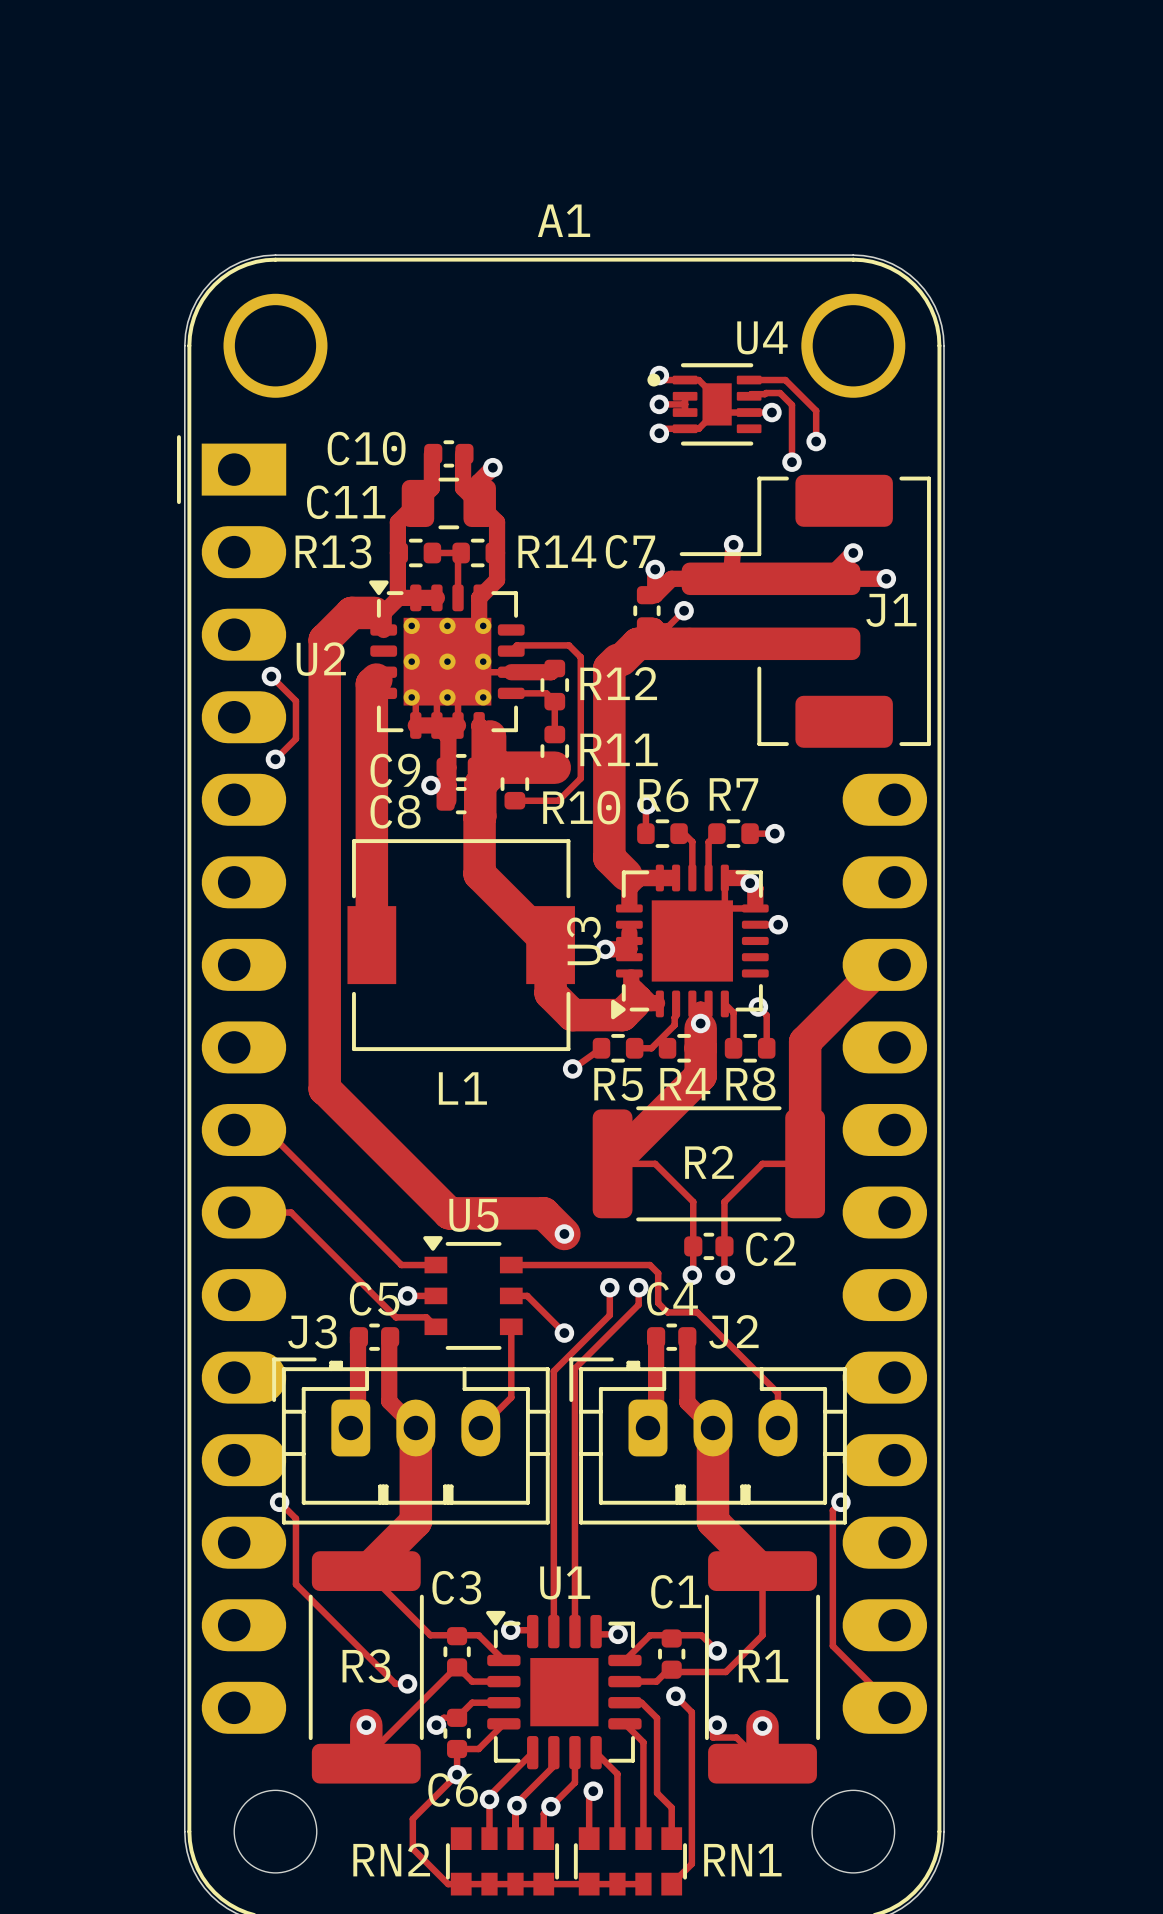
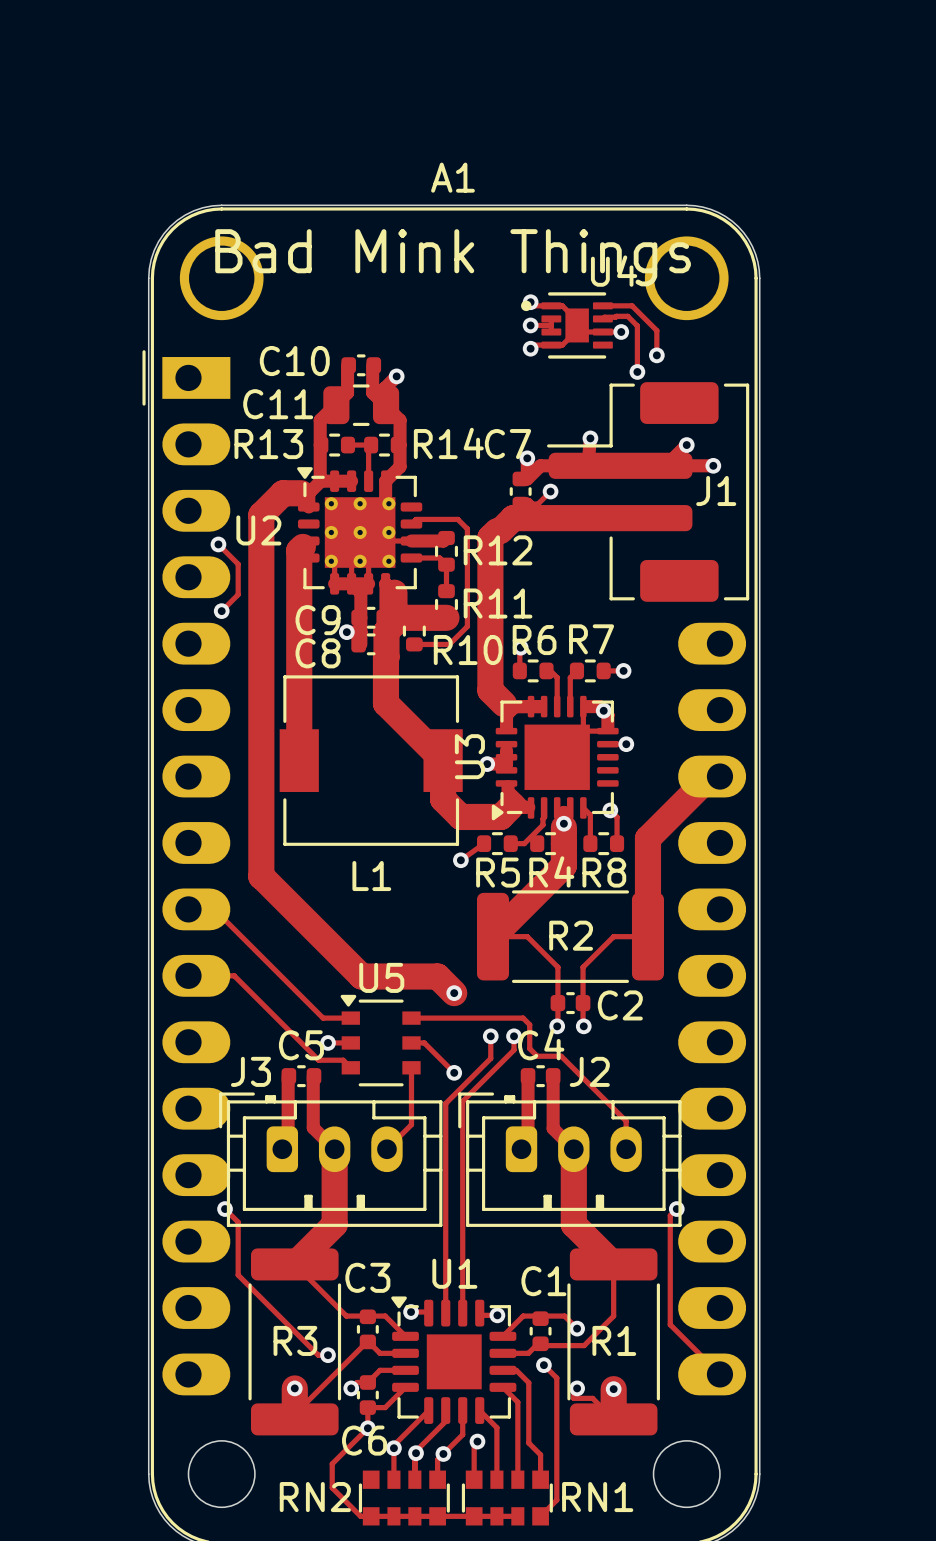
text: none -> Bad Mink Things (453, 257)

